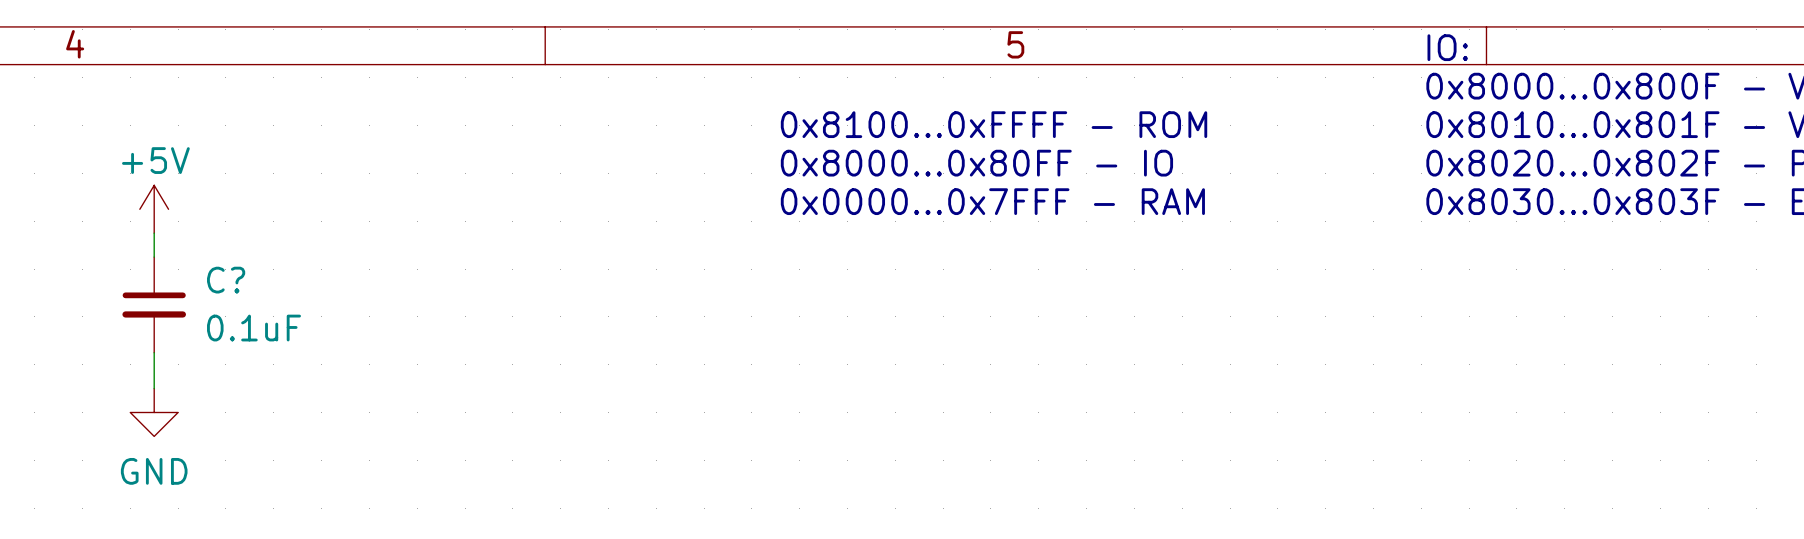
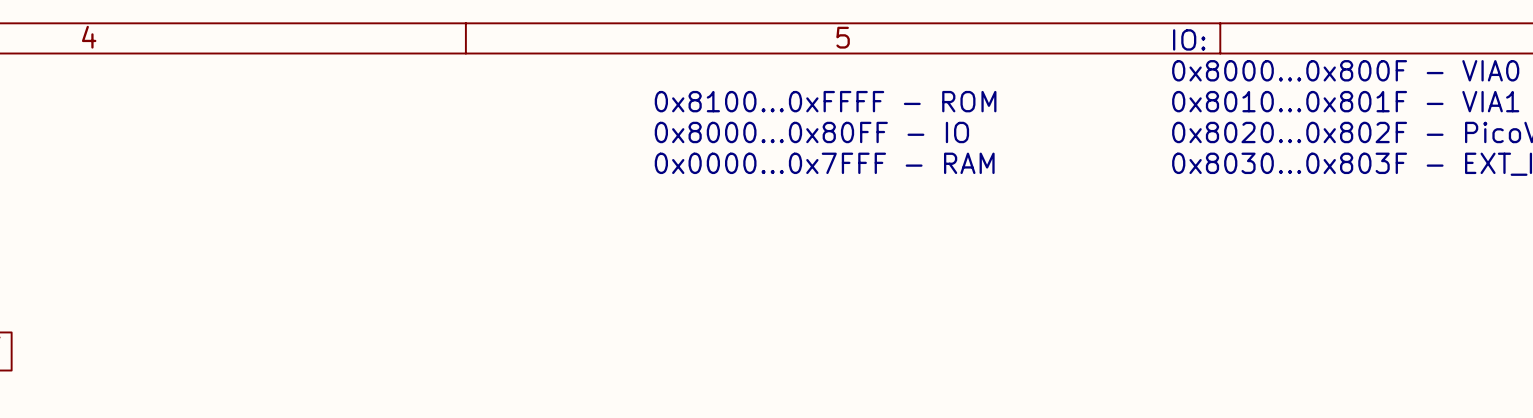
power symbol: +5V (154, 209) -> none
wire: (154, 233) (154, 257) -> none
C?: 0.1uF (154, 304) -> none
wire: (154, 352) (154, 388) -> none
power symbol: GND (154, 412) -> none

